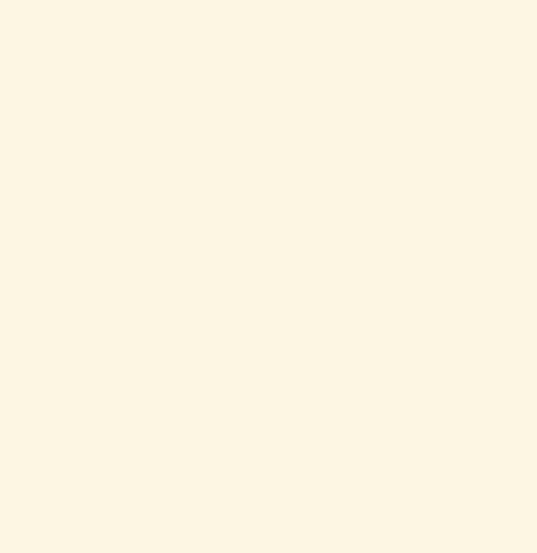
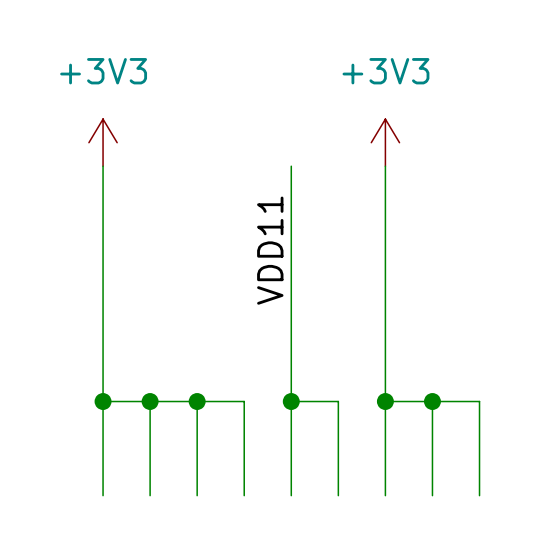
power symbol: none -> +3V3 (103, 142)
power symbol: none -> +3V3 (385, 142)
wire: none -> (103, 166) (103, 495)
wire: none -> (291, 166) (291, 495)
wire: none -> (385, 166) (385, 495)
label: none -> VDD11 (270, 250)
wire: none -> (103, 401) (244, 401) (244, 495)
junction: none -> (103, 401)
wire: none -> (150, 401) (150, 495)
junction: none -> (150, 401)
wire: none -> (197, 401) (197, 495)
junction: none -> (197, 401)
wire: none -> (291, 401) (338, 401) (338, 495)
junction: none -> (291, 401)
wire: none -> (385, 401) (479, 401) (479, 495)
junction: none -> (385, 401)
wire: none -> (432, 401) (432, 495)
junction: none -> (432, 401)

